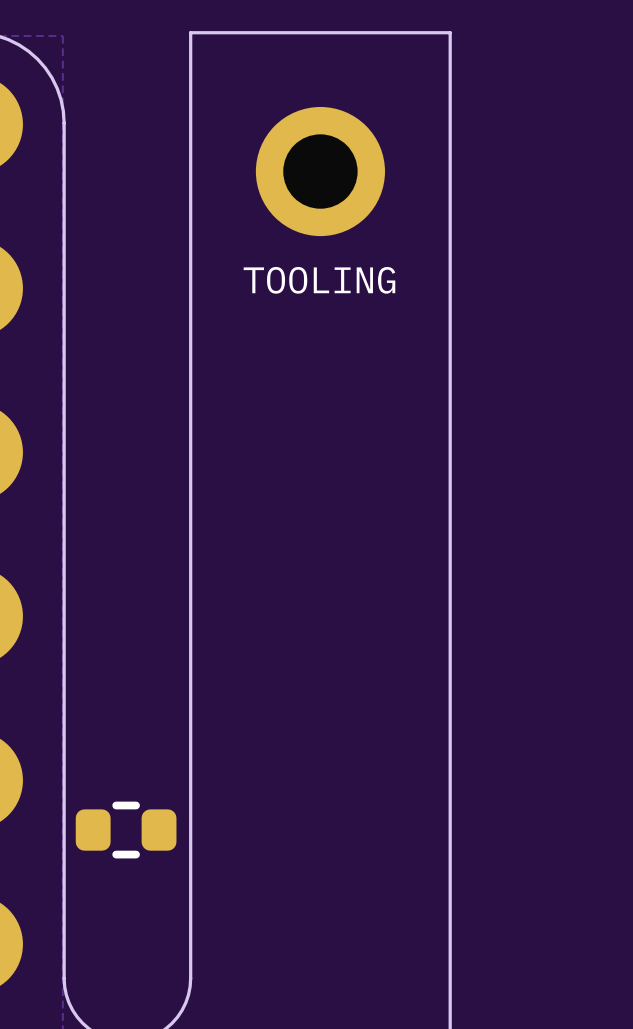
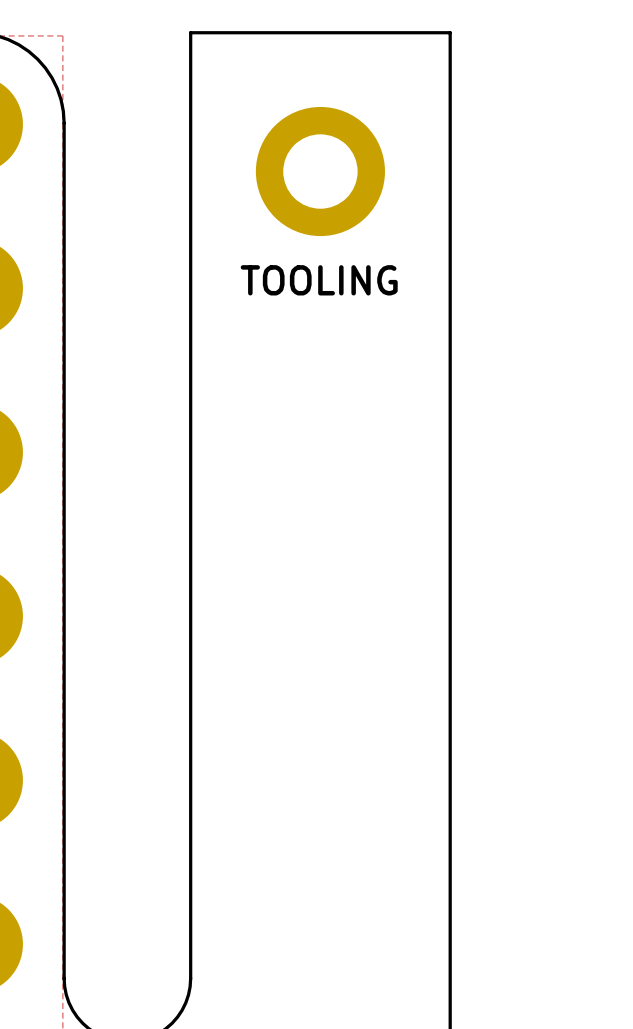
part: (126, 830) -> none

